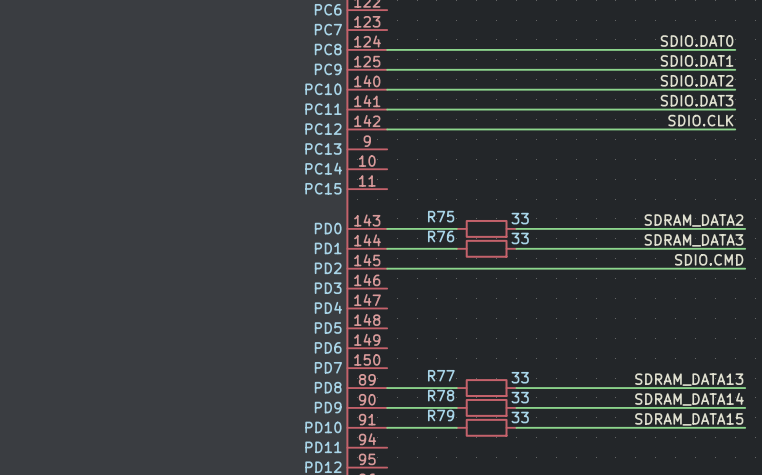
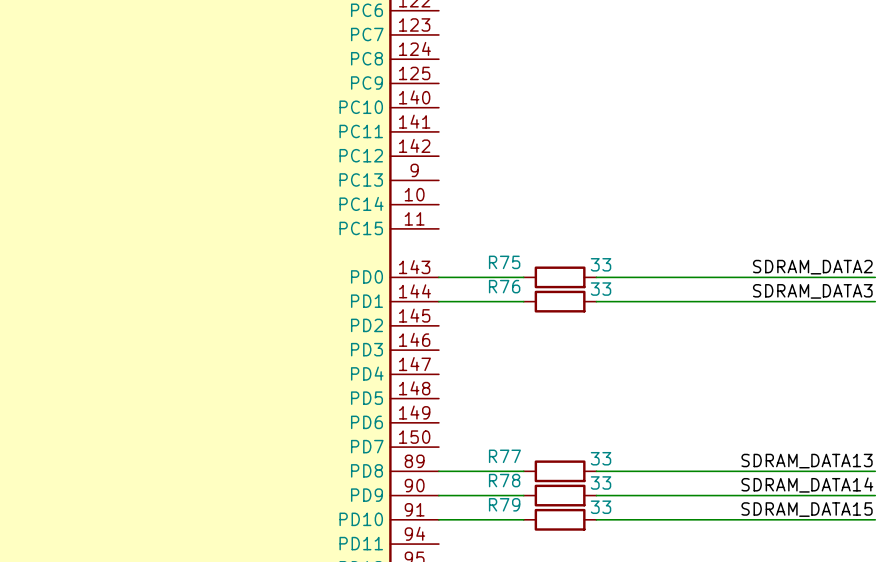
label: SDIO.DAT0 (697, 41) -> none
wire: (387, 49) (735, 49) -> none
label: SDIO.DAT1 (697, 60) -> none
wire: (387, 69) (735, 69) -> none
label: SDIO.DAT2 (697, 80) -> none
wire: (387, 89) (735, 89) -> none
label: SDIO.DAT3 (697, 100) -> none
wire: (387, 109) (735, 109) -> none
label: SDIO.CLK (700, 120) -> none
wire: (387, 129) (735, 129) -> none
label: SDIO.CMD (709, 259) -> none
wire: (387, 268) (745, 268) -> none

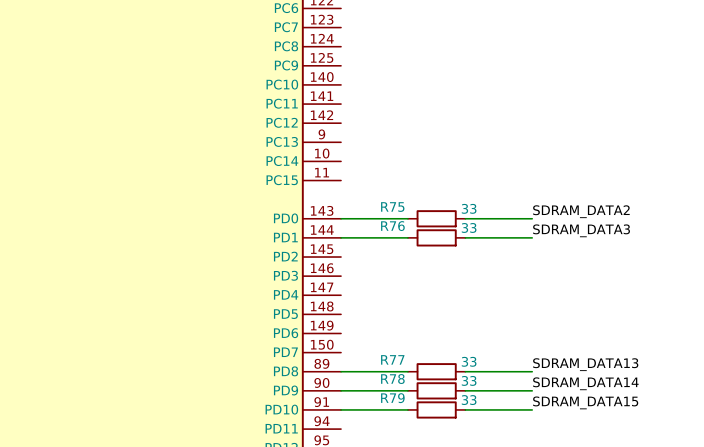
label position: SDRAM_DATA2 (812, 267) -> SDRAM_DATA2 (581, 211)
wire: (681, 277) (875, 277) -> none
label position: SDRAM_DATA3 (812, 291) -> SDRAM_DATA3 (581, 230)
wire: (681, 301) (875, 301) -> none
label position: SDRAM_DATA13 (807, 461) -> SDRAM_DATA13 (585, 364)
wire: (681, 471) (875, 471) -> none
label position: SDRAM_DATA14 (807, 485) -> SDRAM_DATA14 (585, 383)
wire: (681, 495) (875, 495) -> none
label position: SDRAM_DATA15 (807, 509) -> SDRAM_DATA15 (585, 402)
wire: (681, 519) (875, 519) -> none

